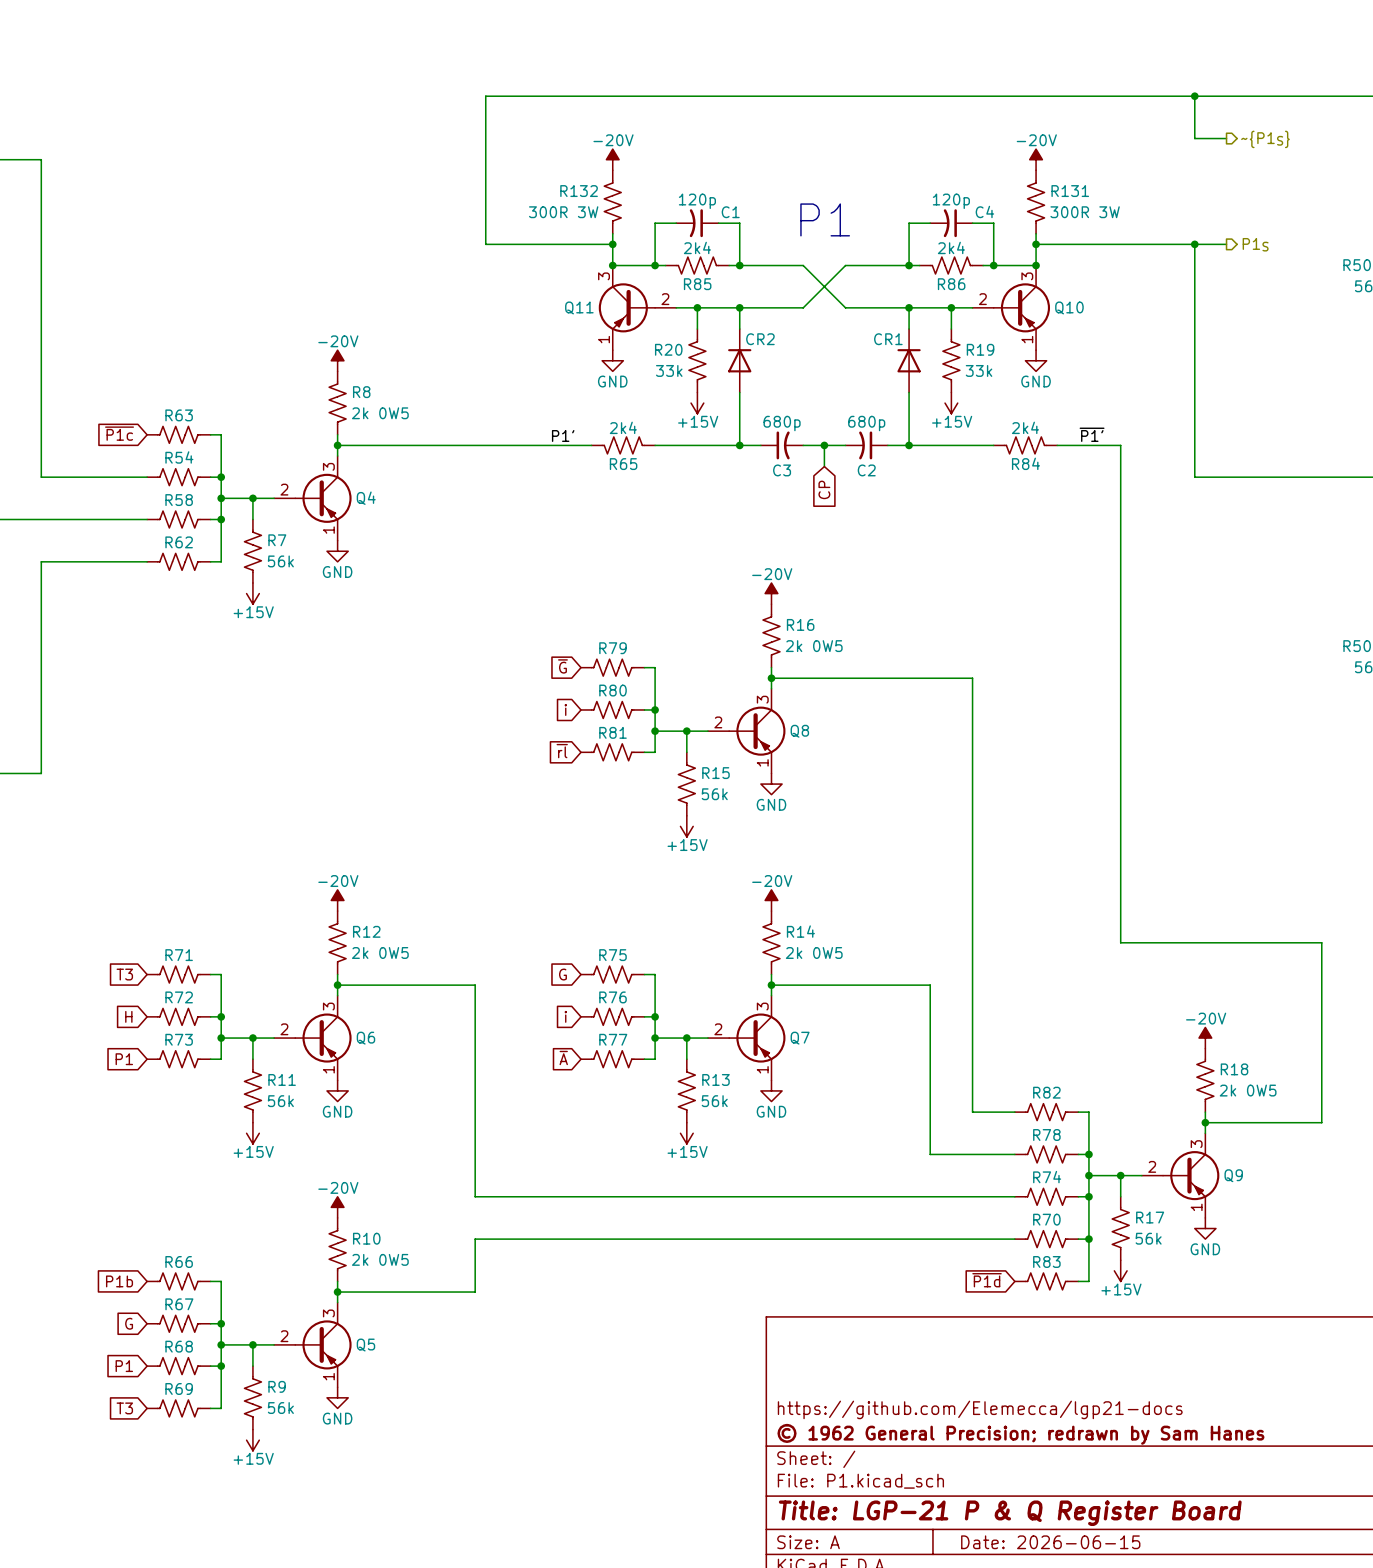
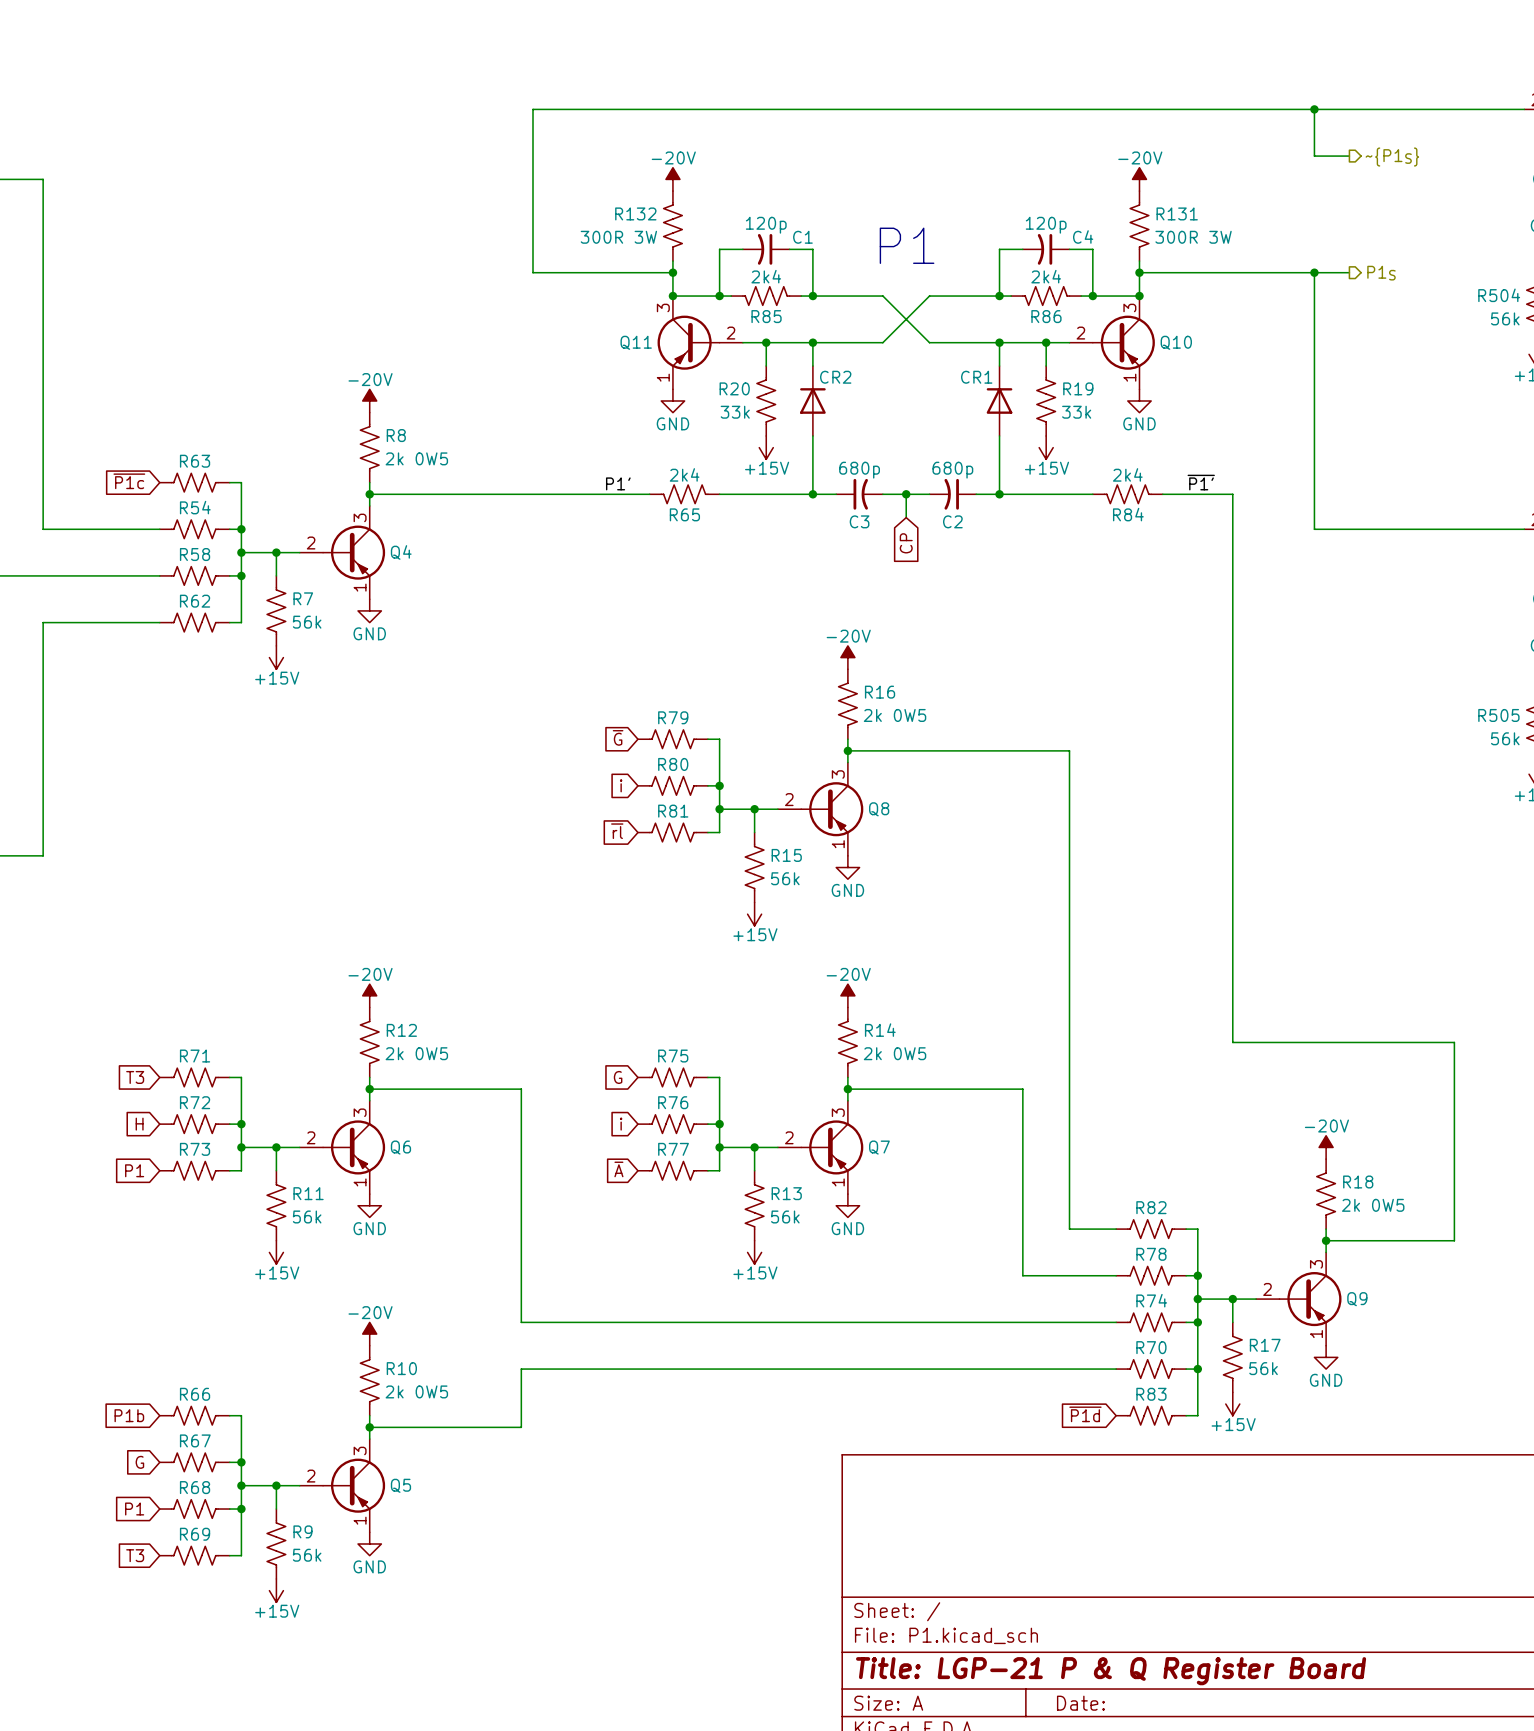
title block: https://github.com/Elemecca/lgp21-docs (980, 1409) -> none
title block: © 1962 General Precision; redrawn by Sam Hanes (1020, 1434) -> none
title block: Date: 2026-06-15 (1050, 1542) -> Date: (1080, 1703)

